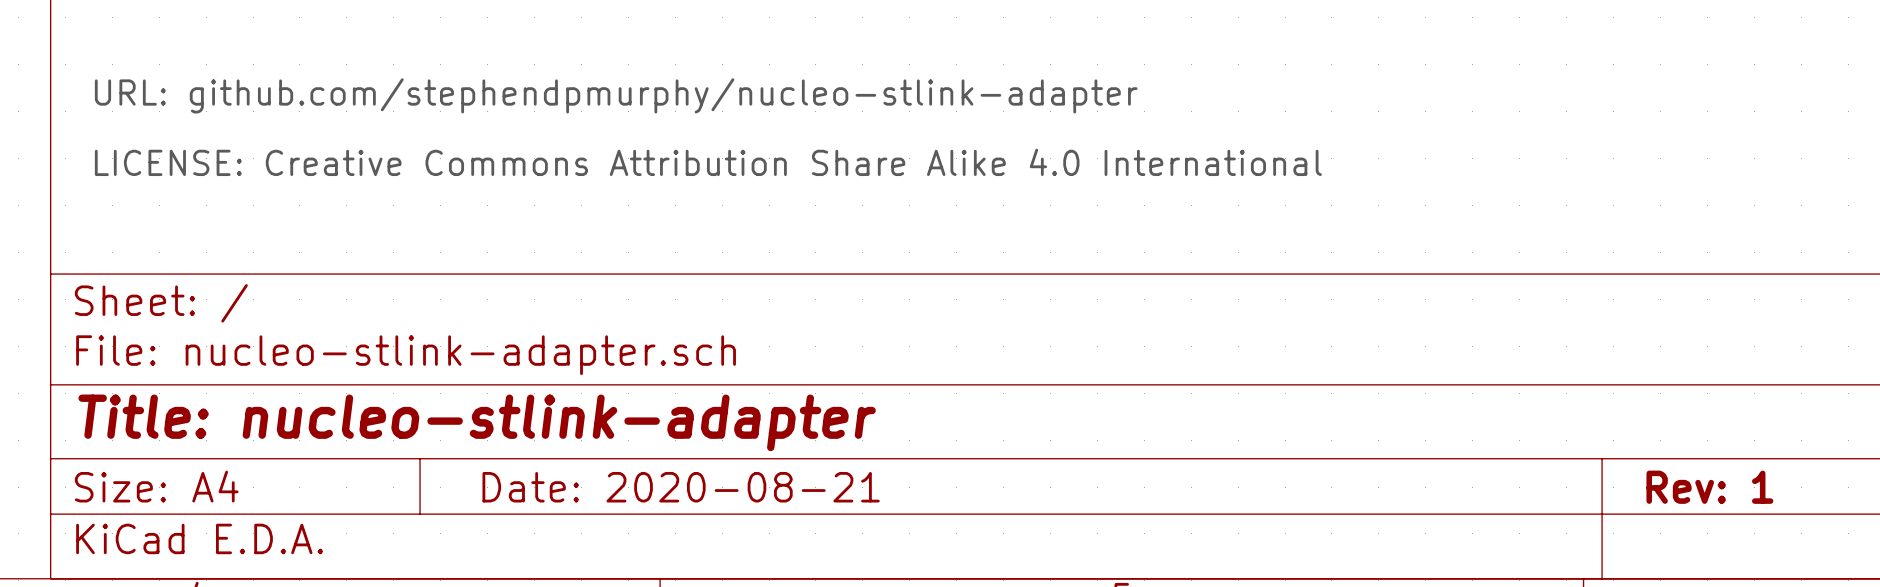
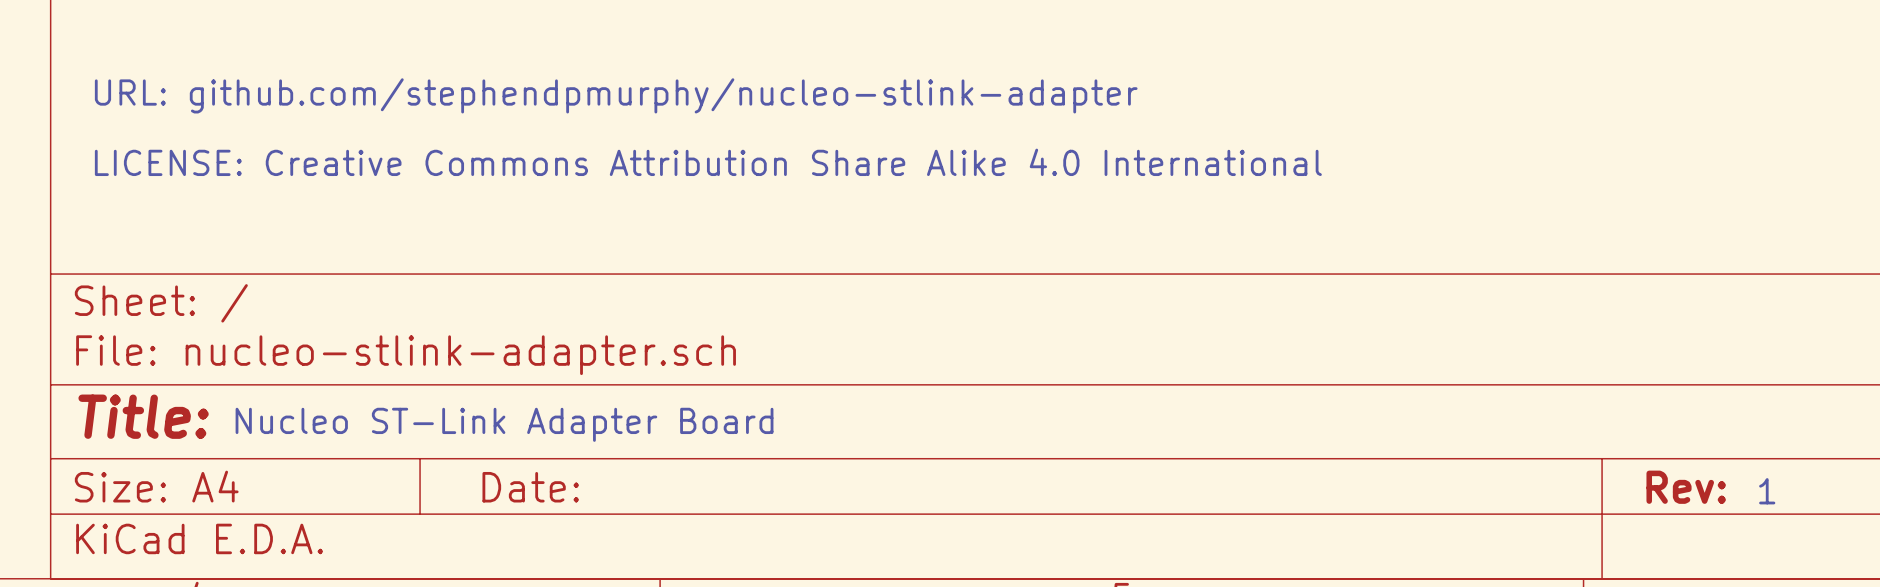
title block: Title: nucleo-stlink-adapter (477, 422) -> Title: (143, 416)
text: none -> Nucleo ST-Link Adapter Board (504, 424)
title block: Date: 2020-08-21 (681, 487) -> Date: (530, 487)
title block: Rev: 1 (1709, 487) -> Rev: (1686, 487)
text: none -> 1 (1767, 491)

